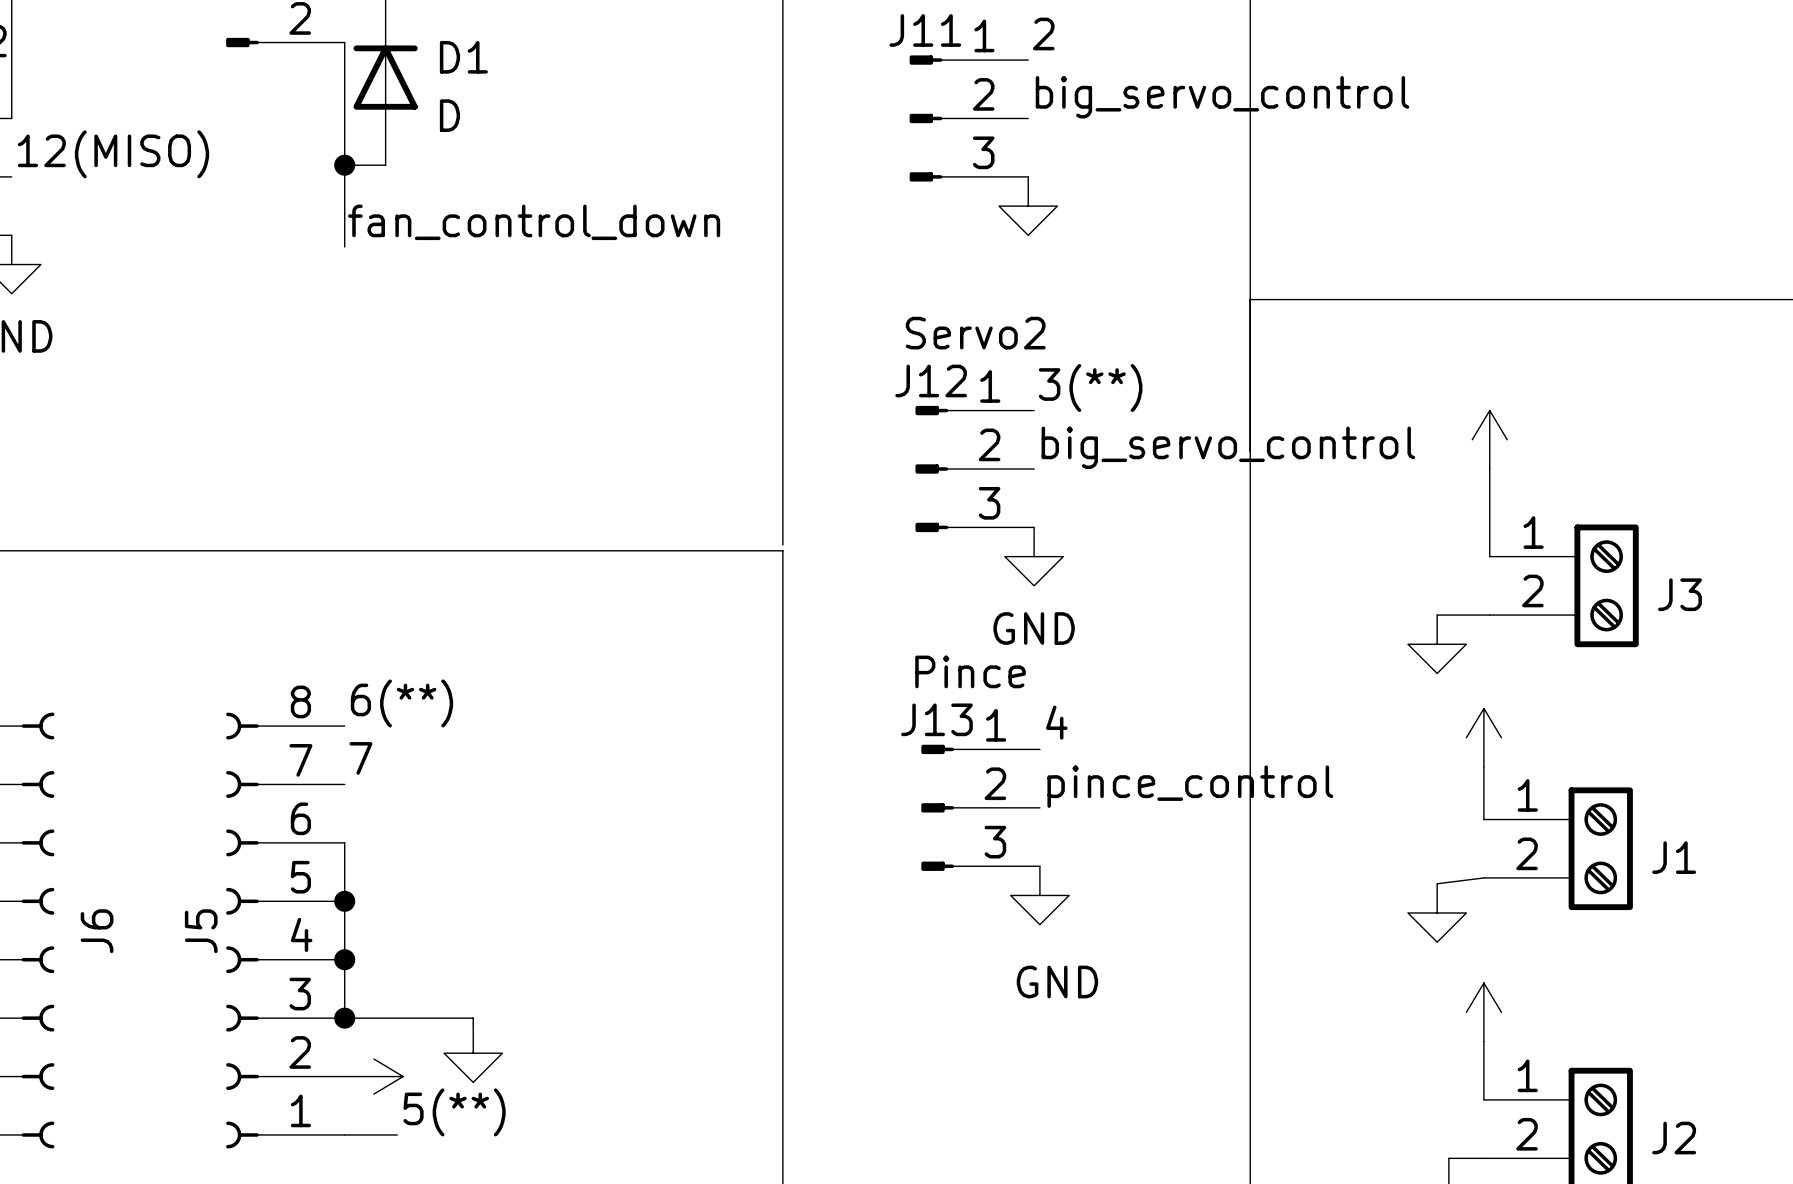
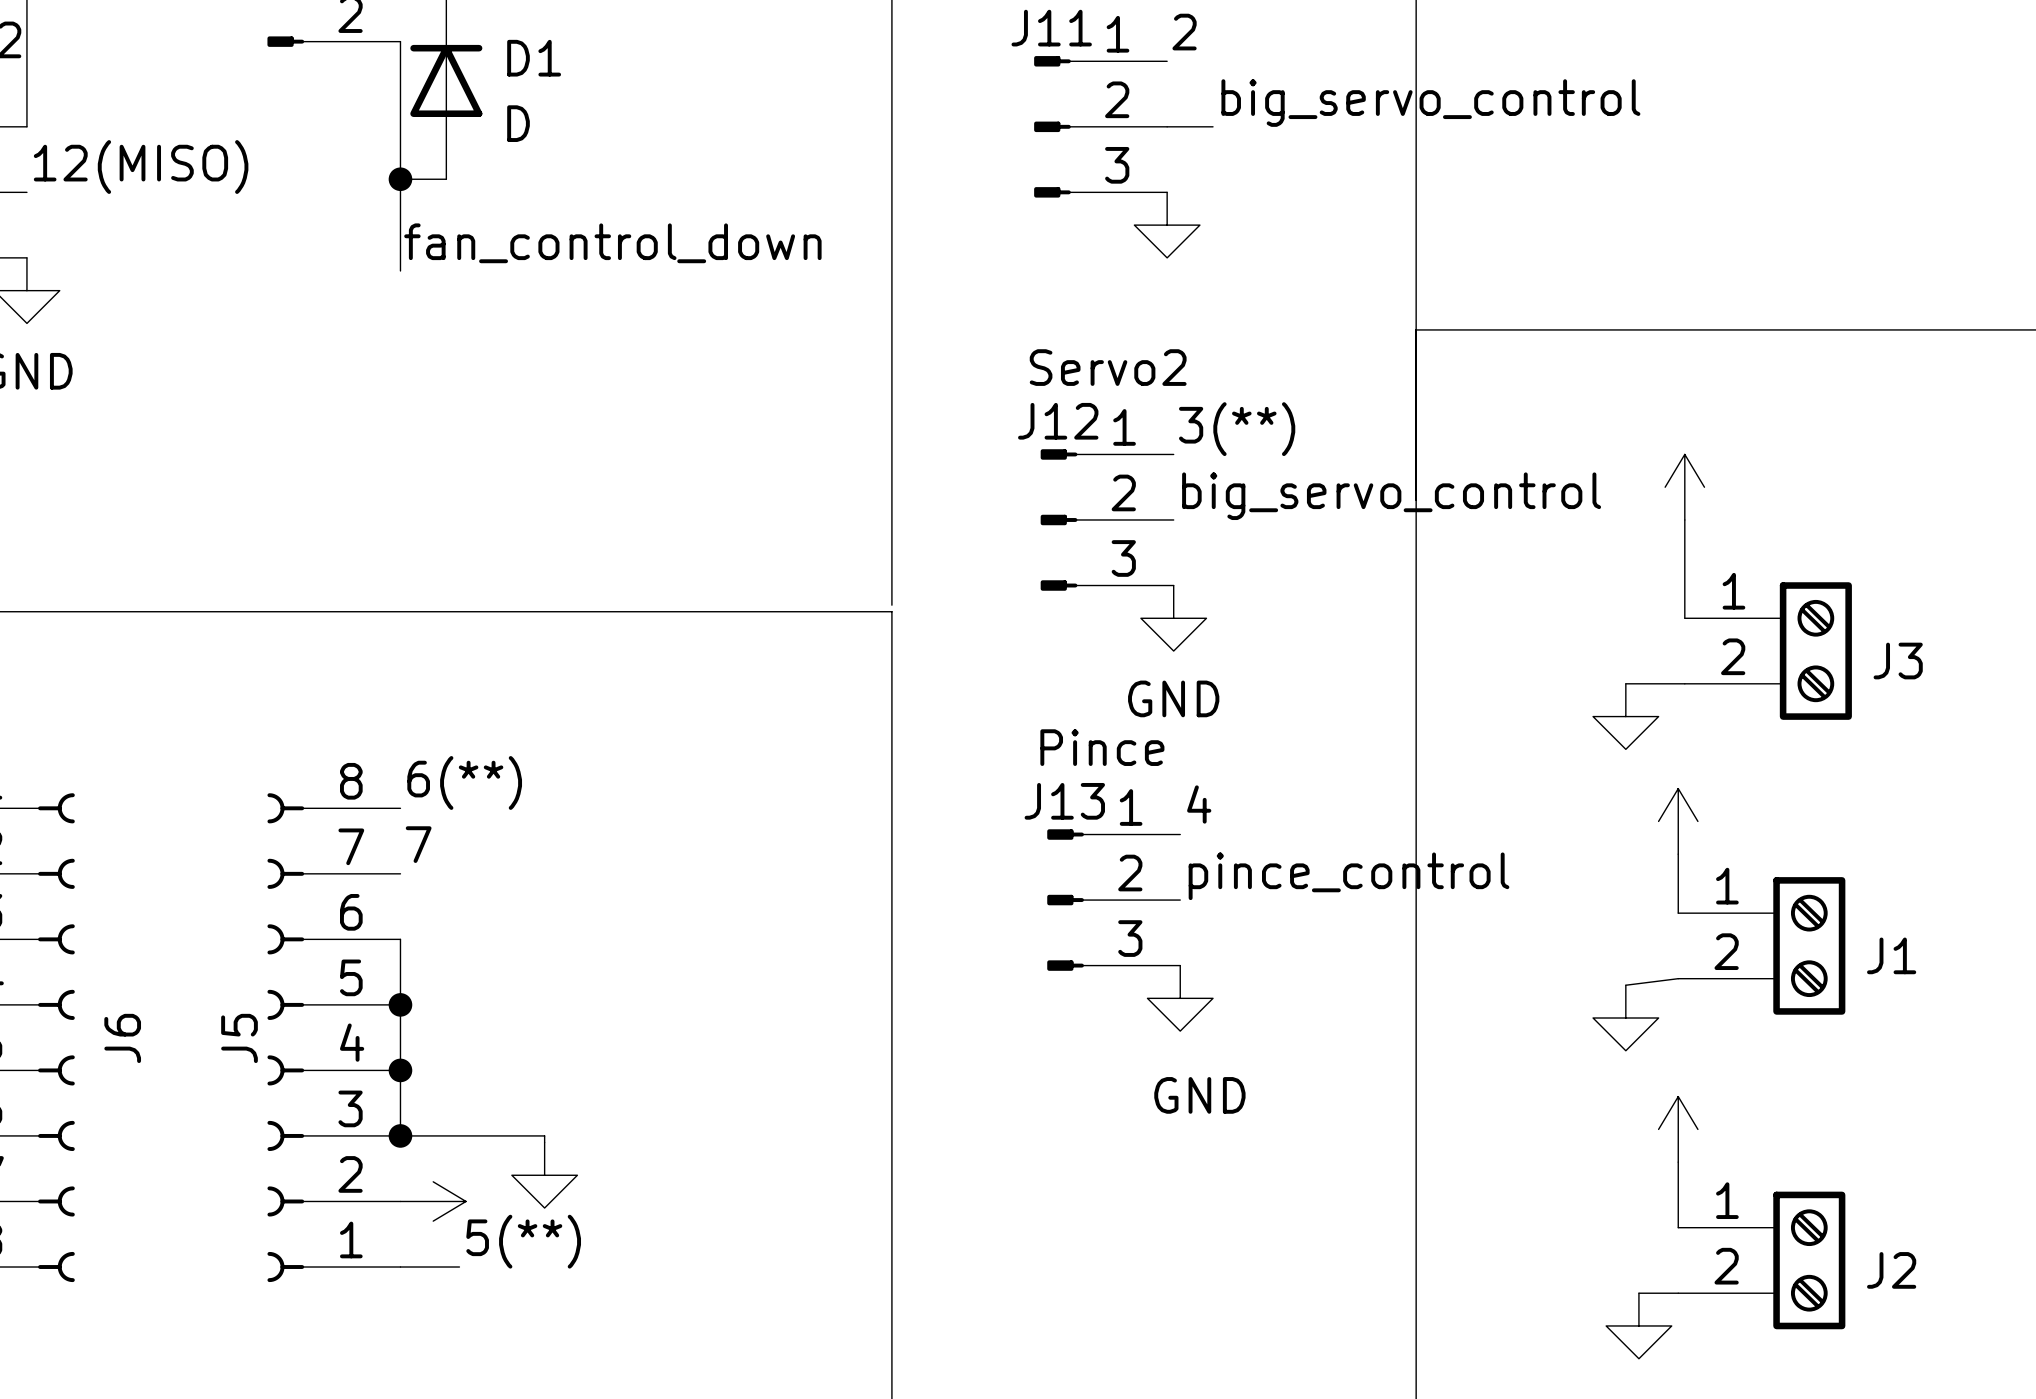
label position: big_servo_control (1222, 97) -> big_servo_control (1430, 103)
wire: none -> (1167, 126) (1213, 126)

